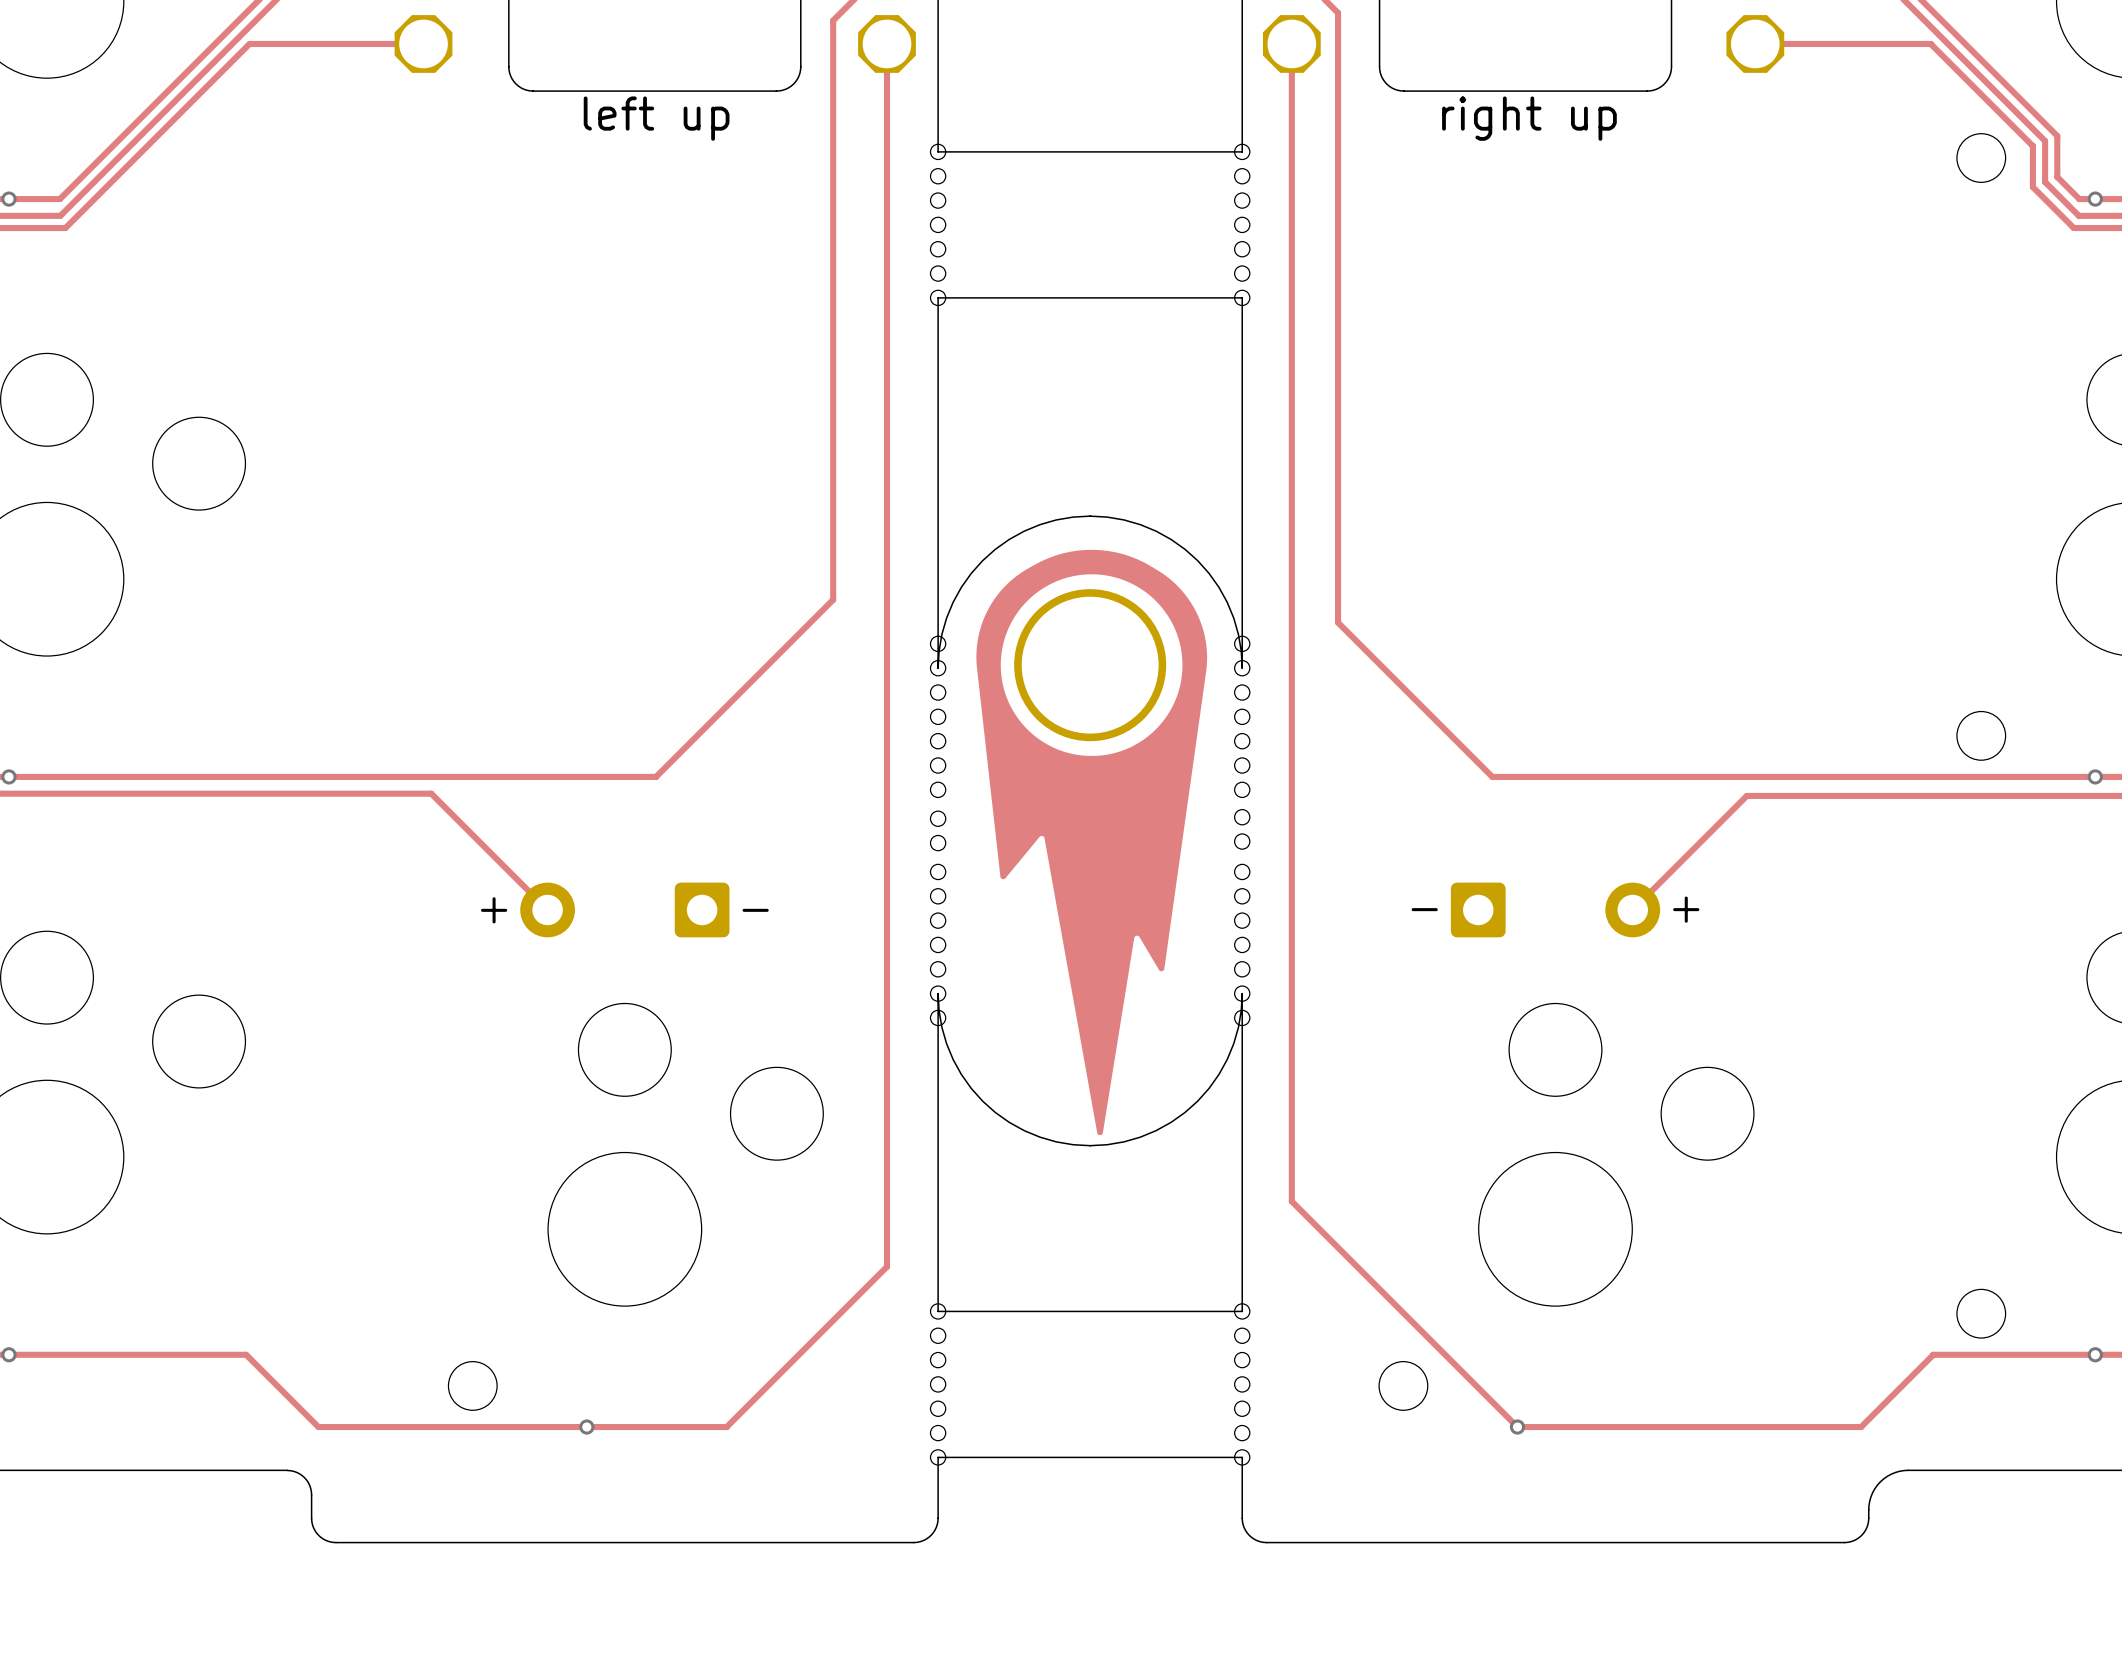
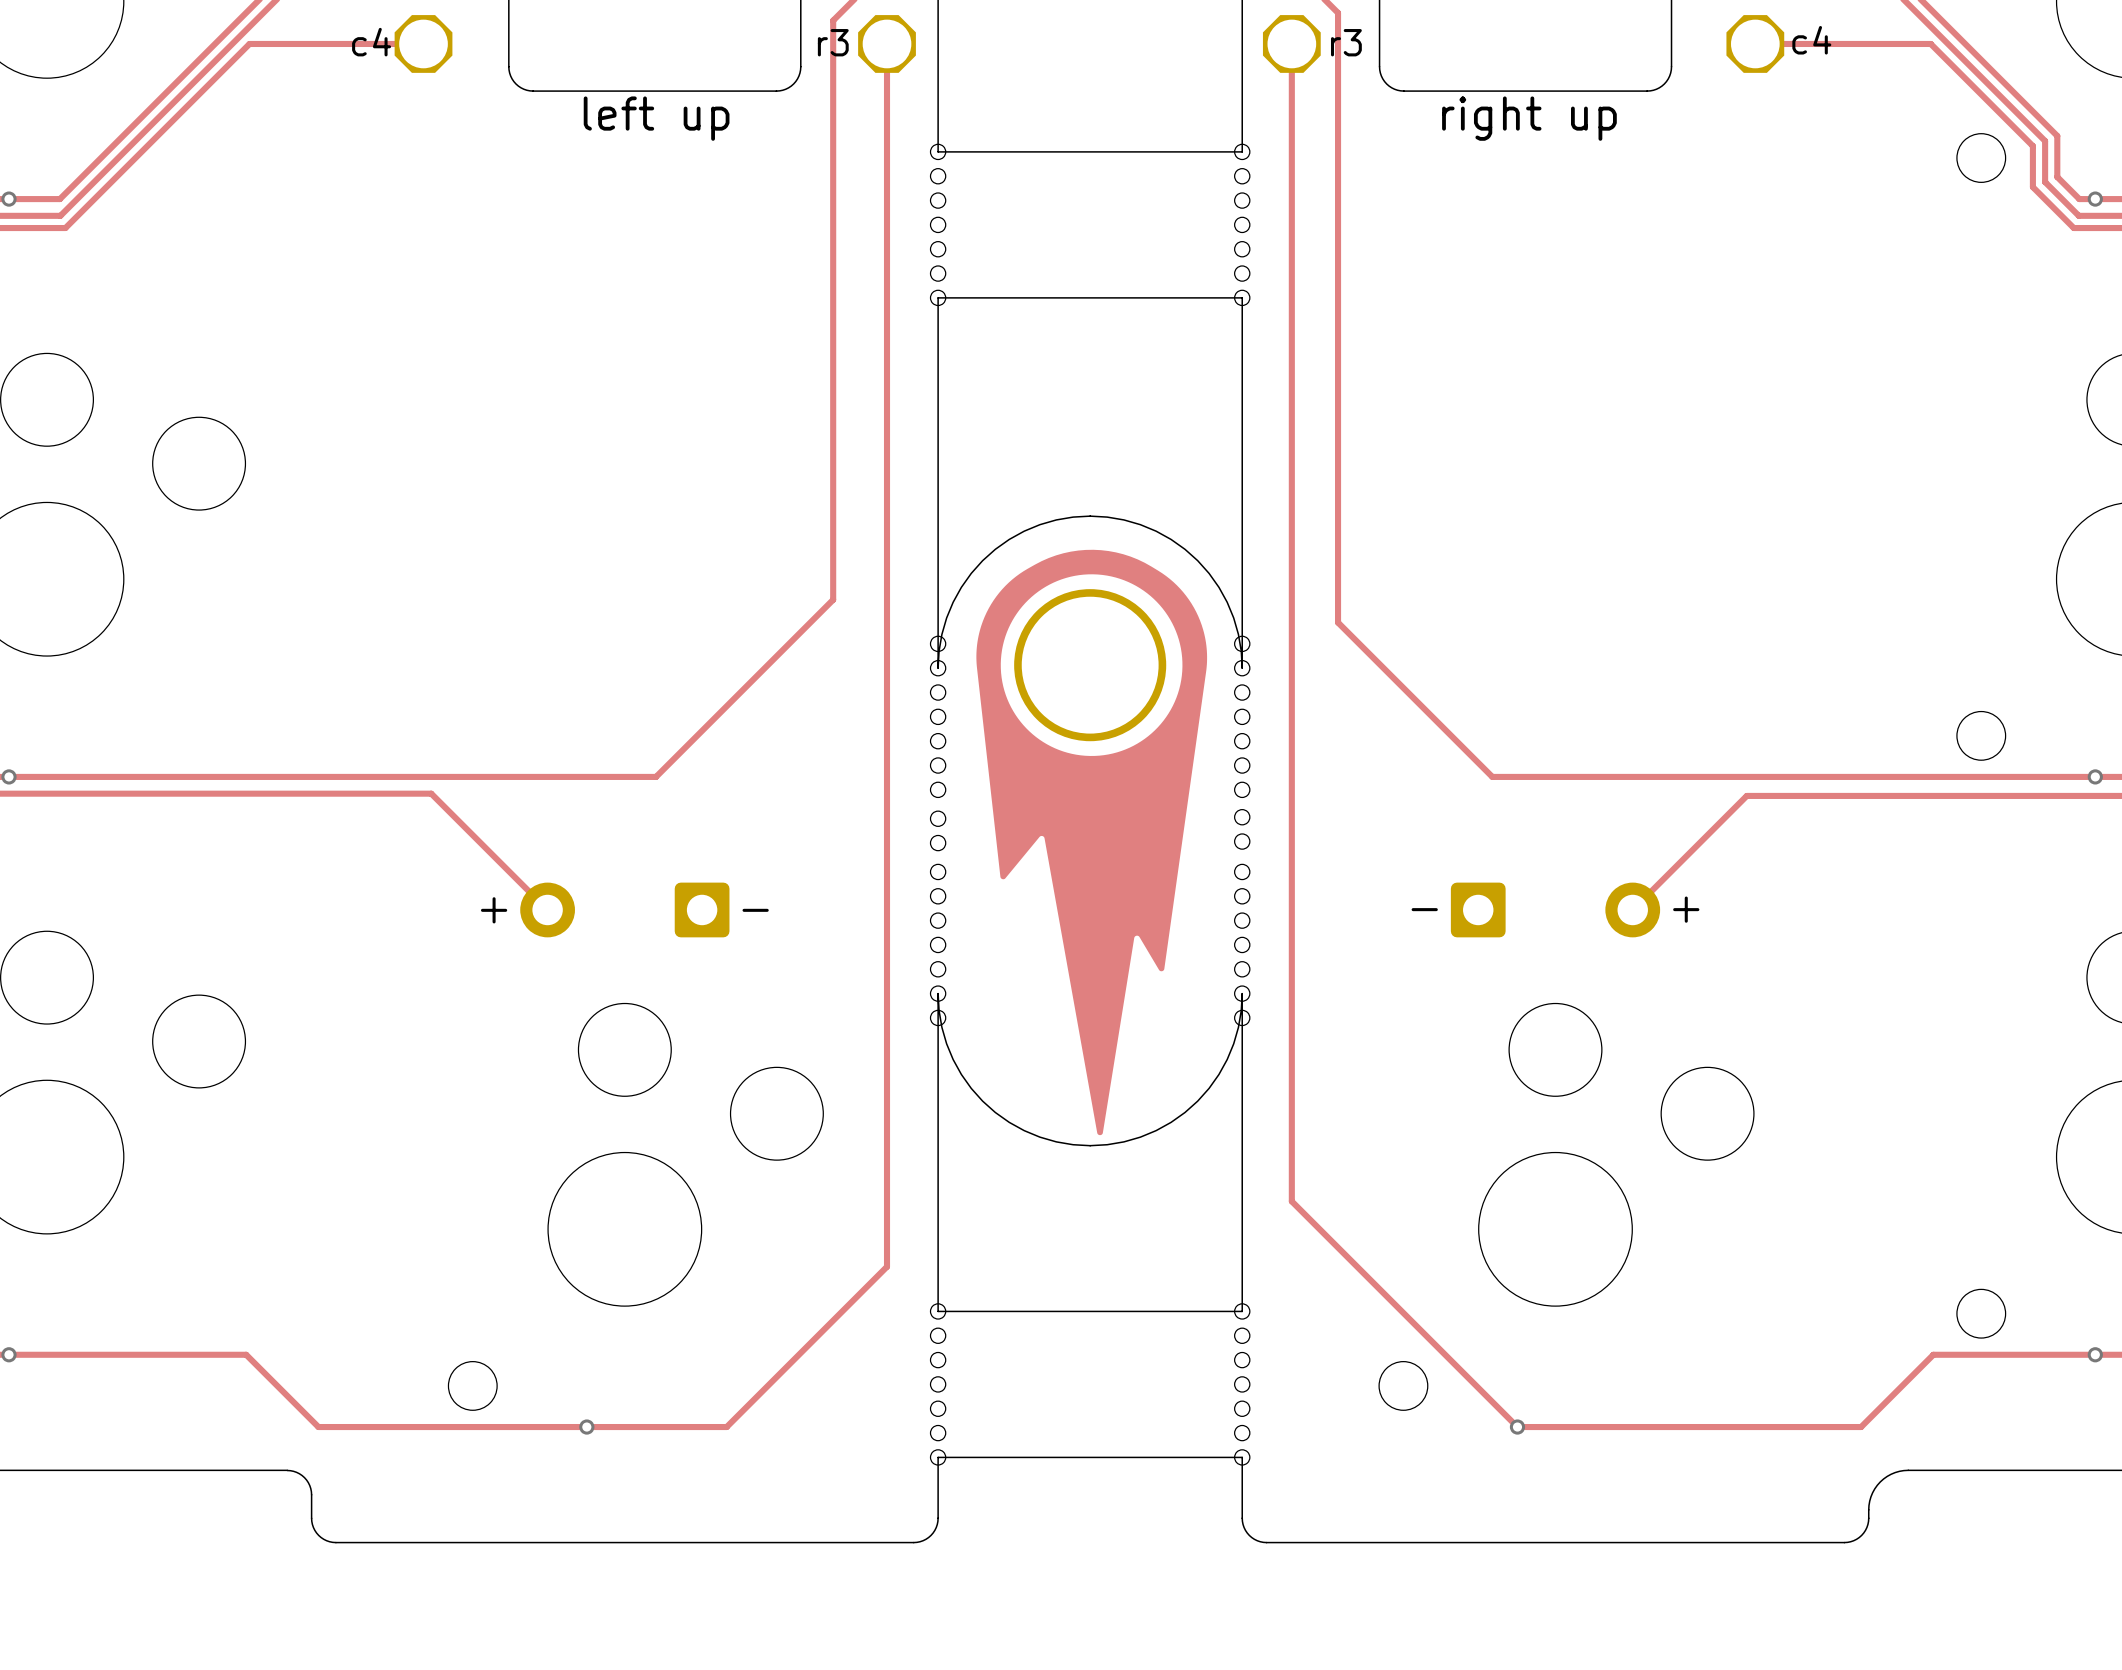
text: none -> c4 (1811, 40)
text: none -> c4 (371, 42)
text: none -> r3 (833, 42)
text: none -> r3 (1346, 42)

